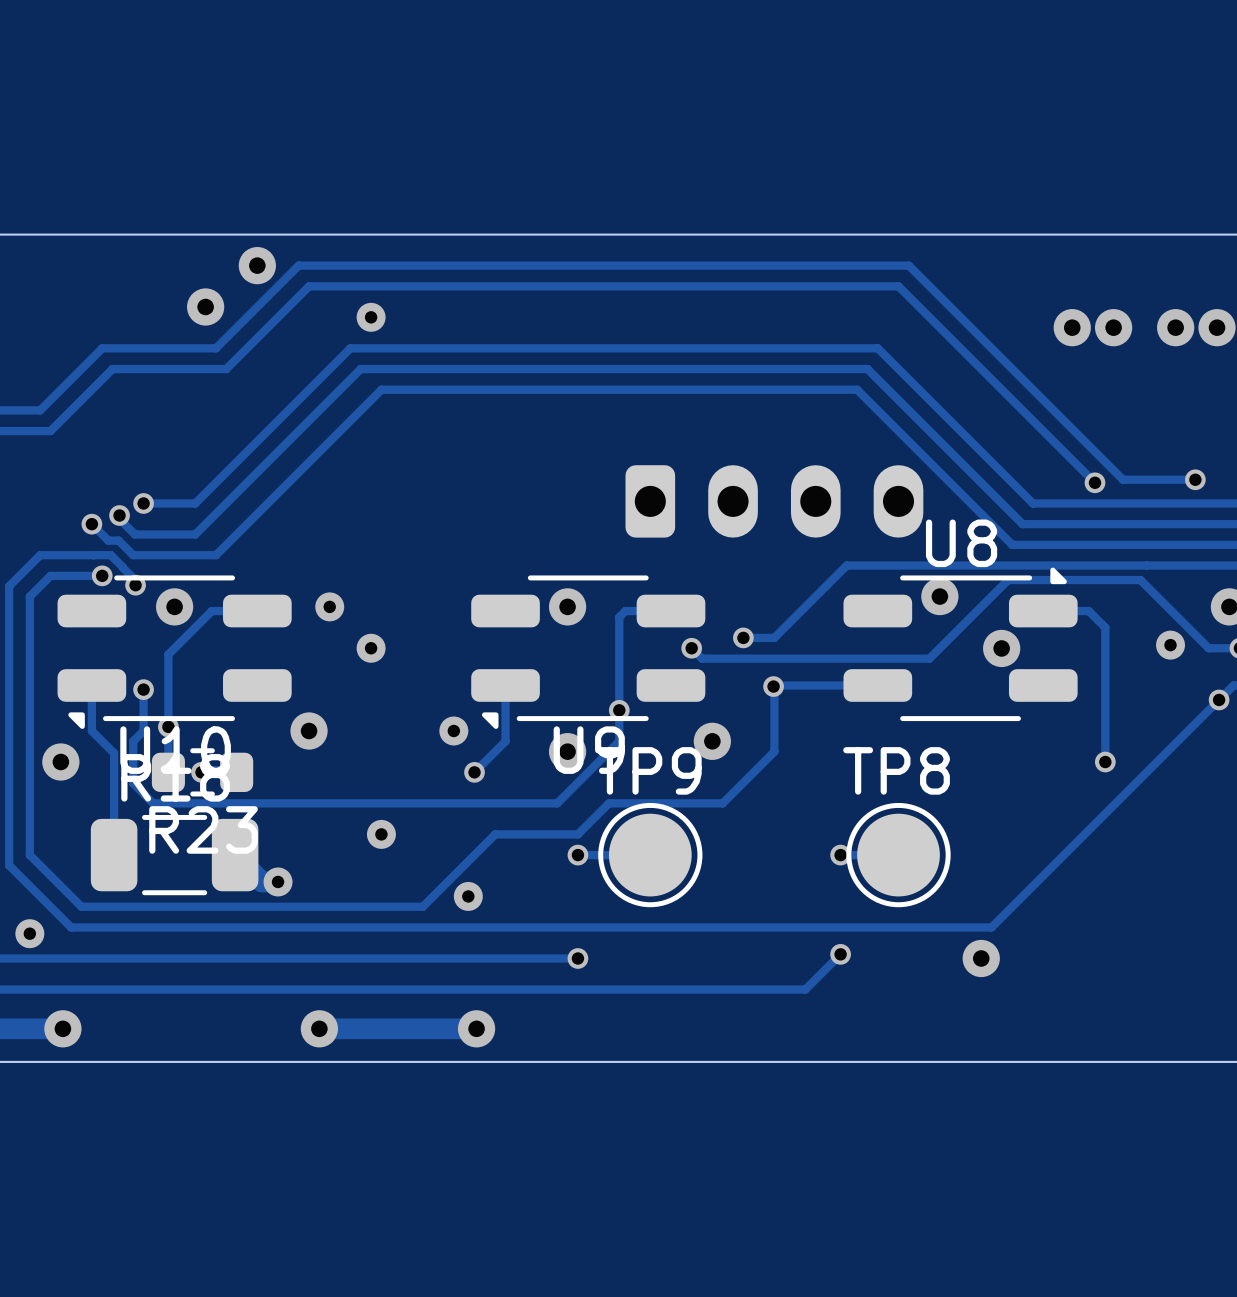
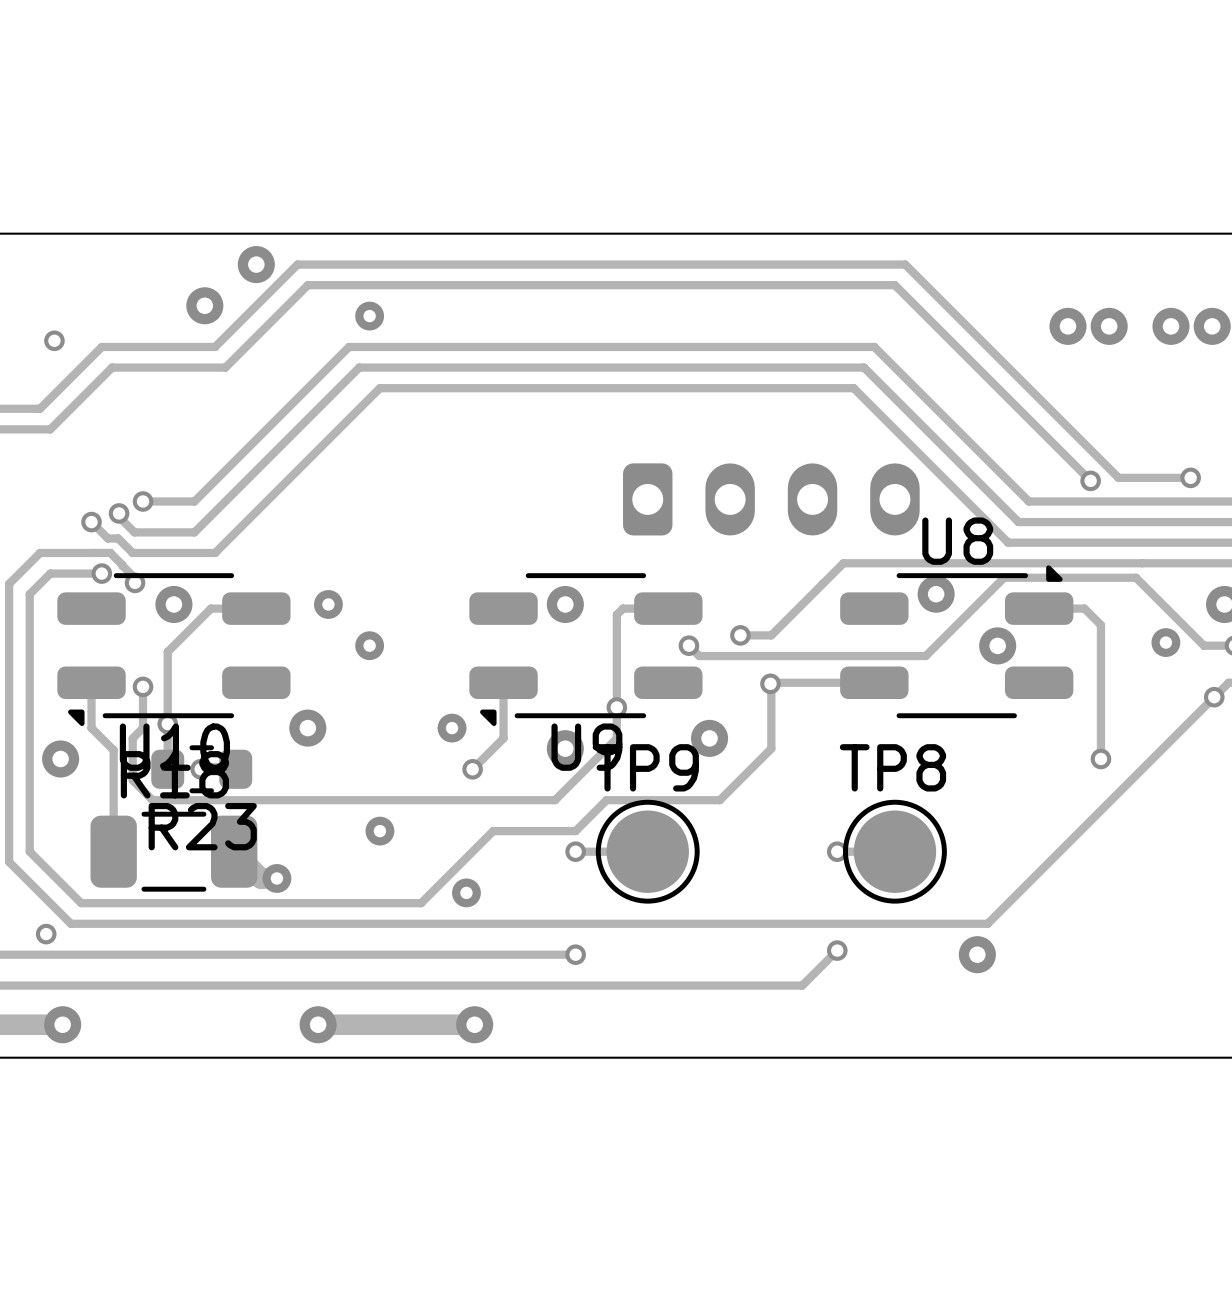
via: none -> (54, 340)
via position: (29, 933) -> (46, 934)

